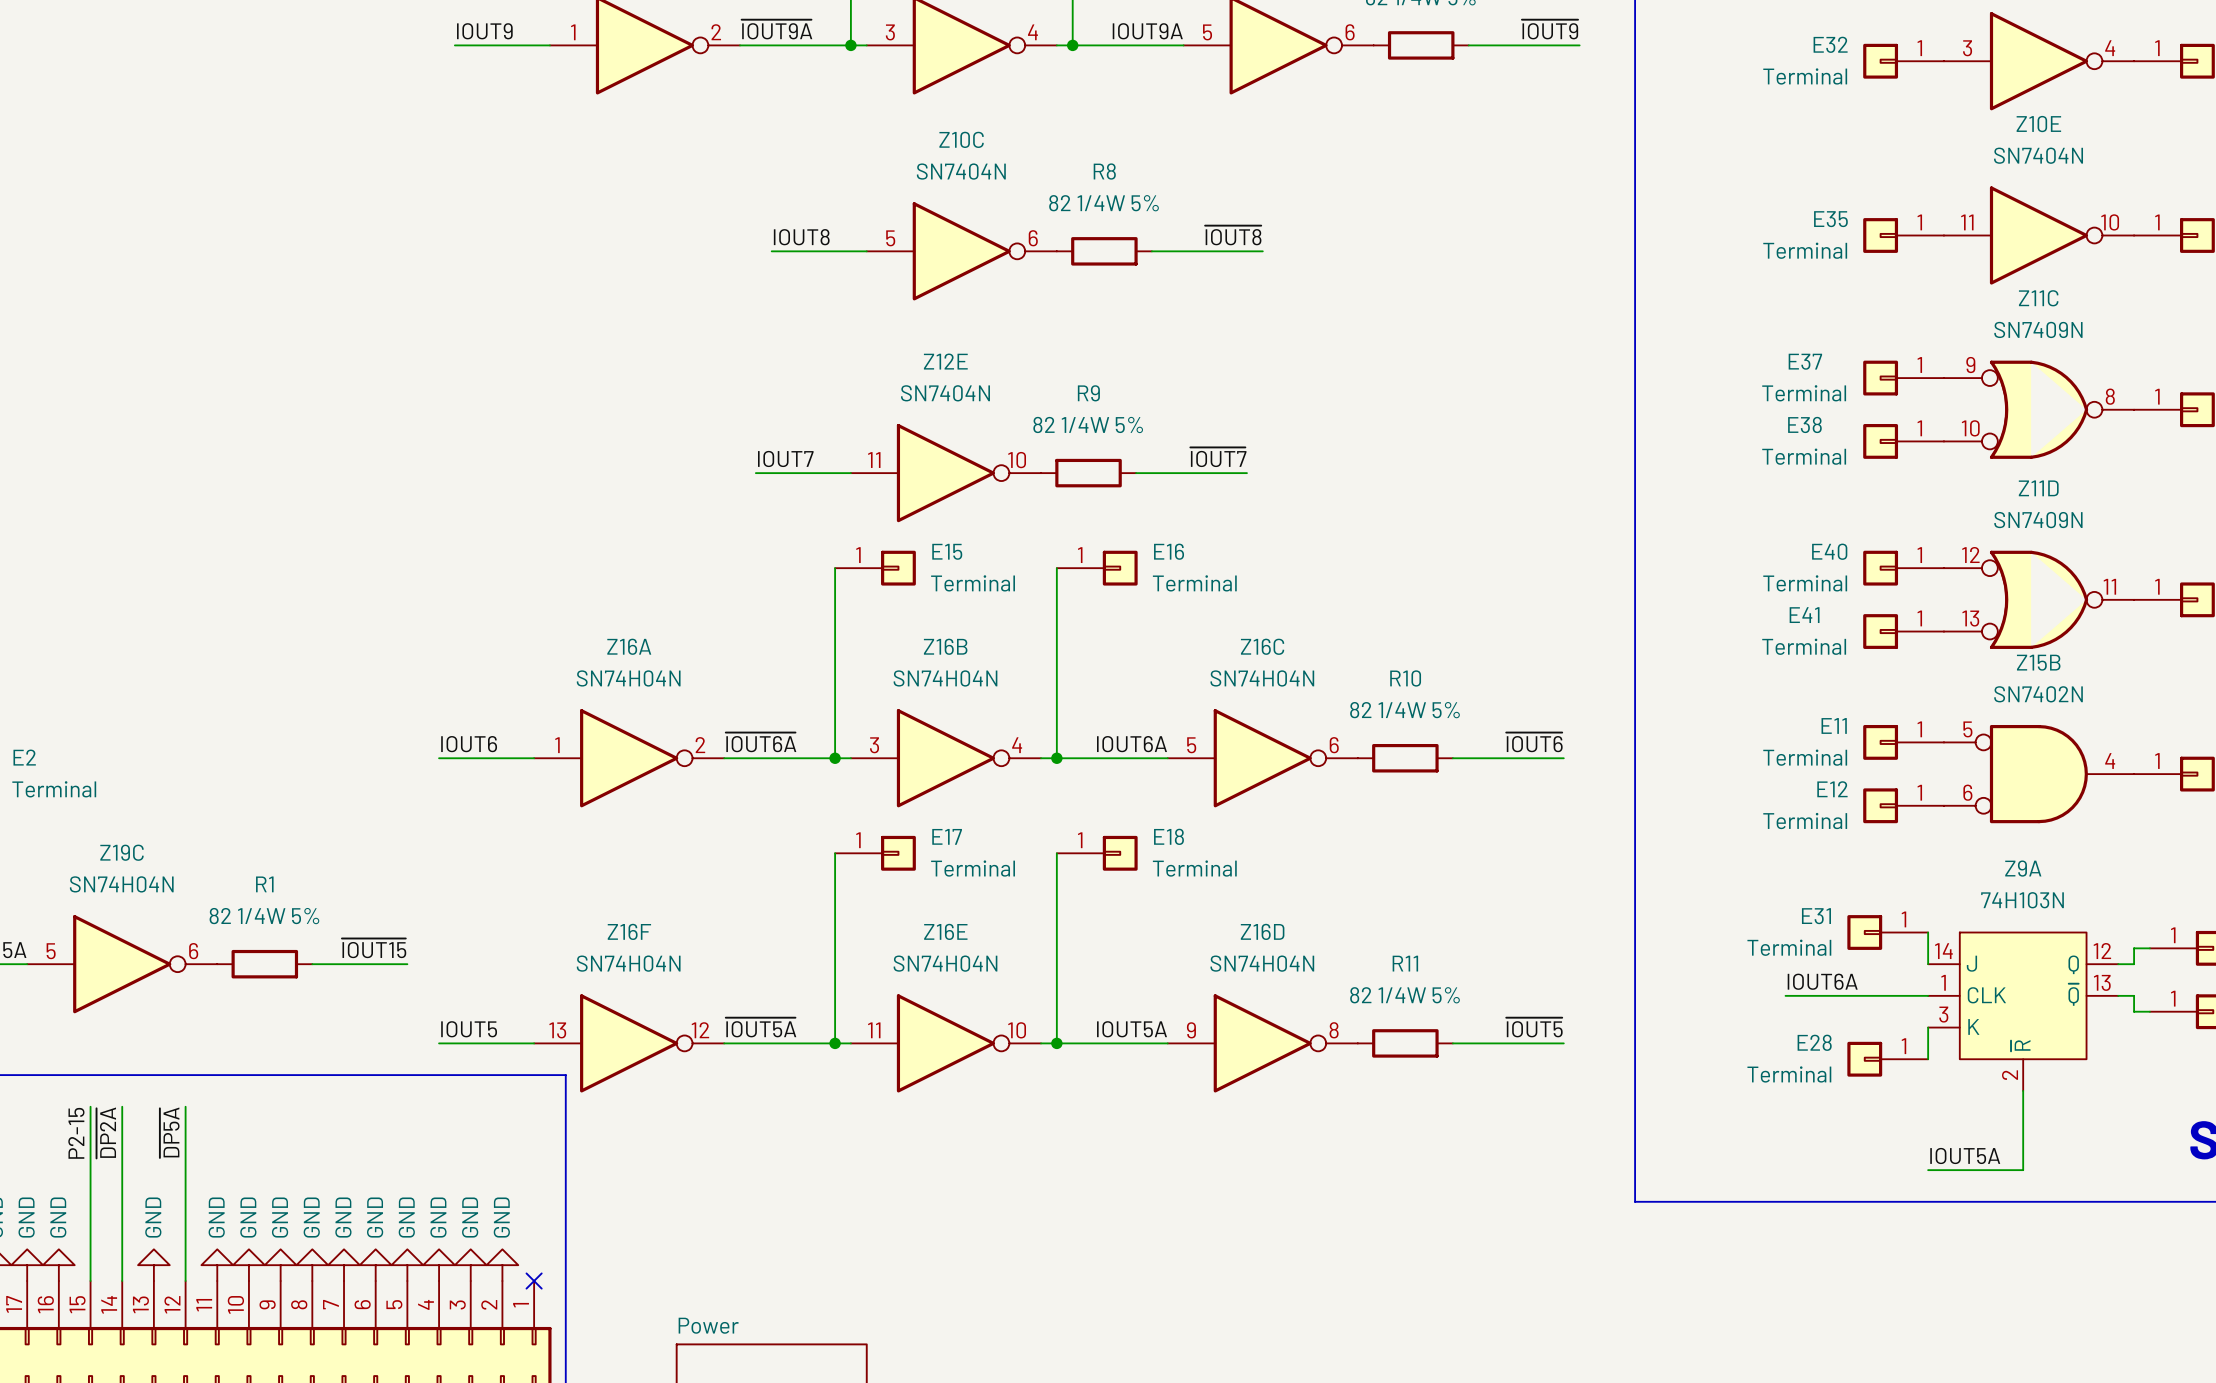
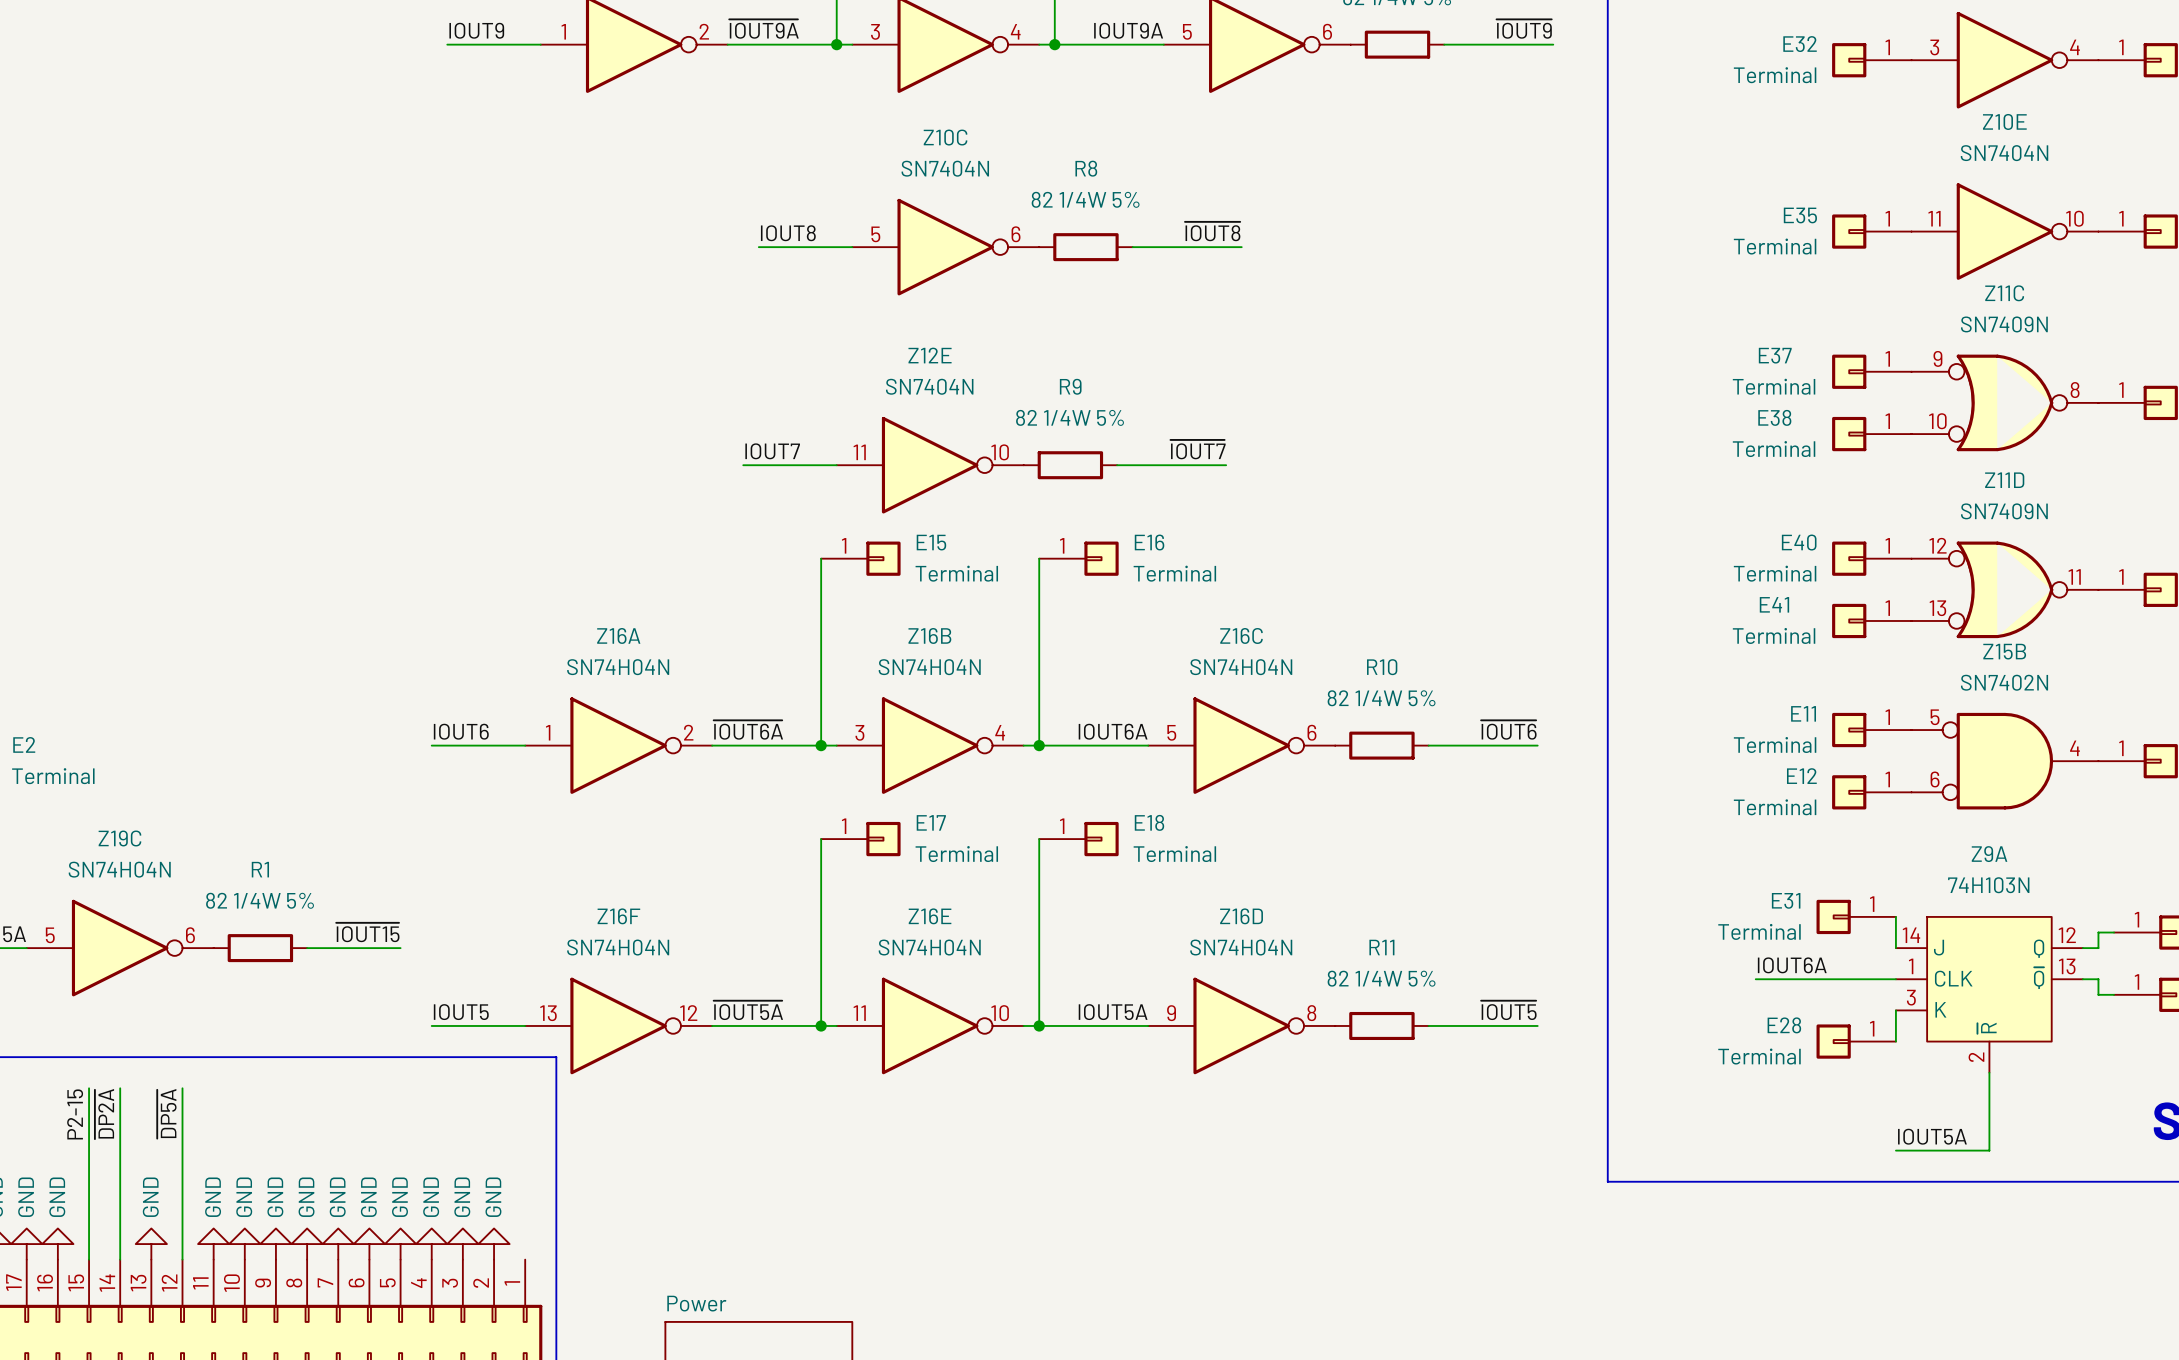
no-connect mark: (534, 1281) -> none

